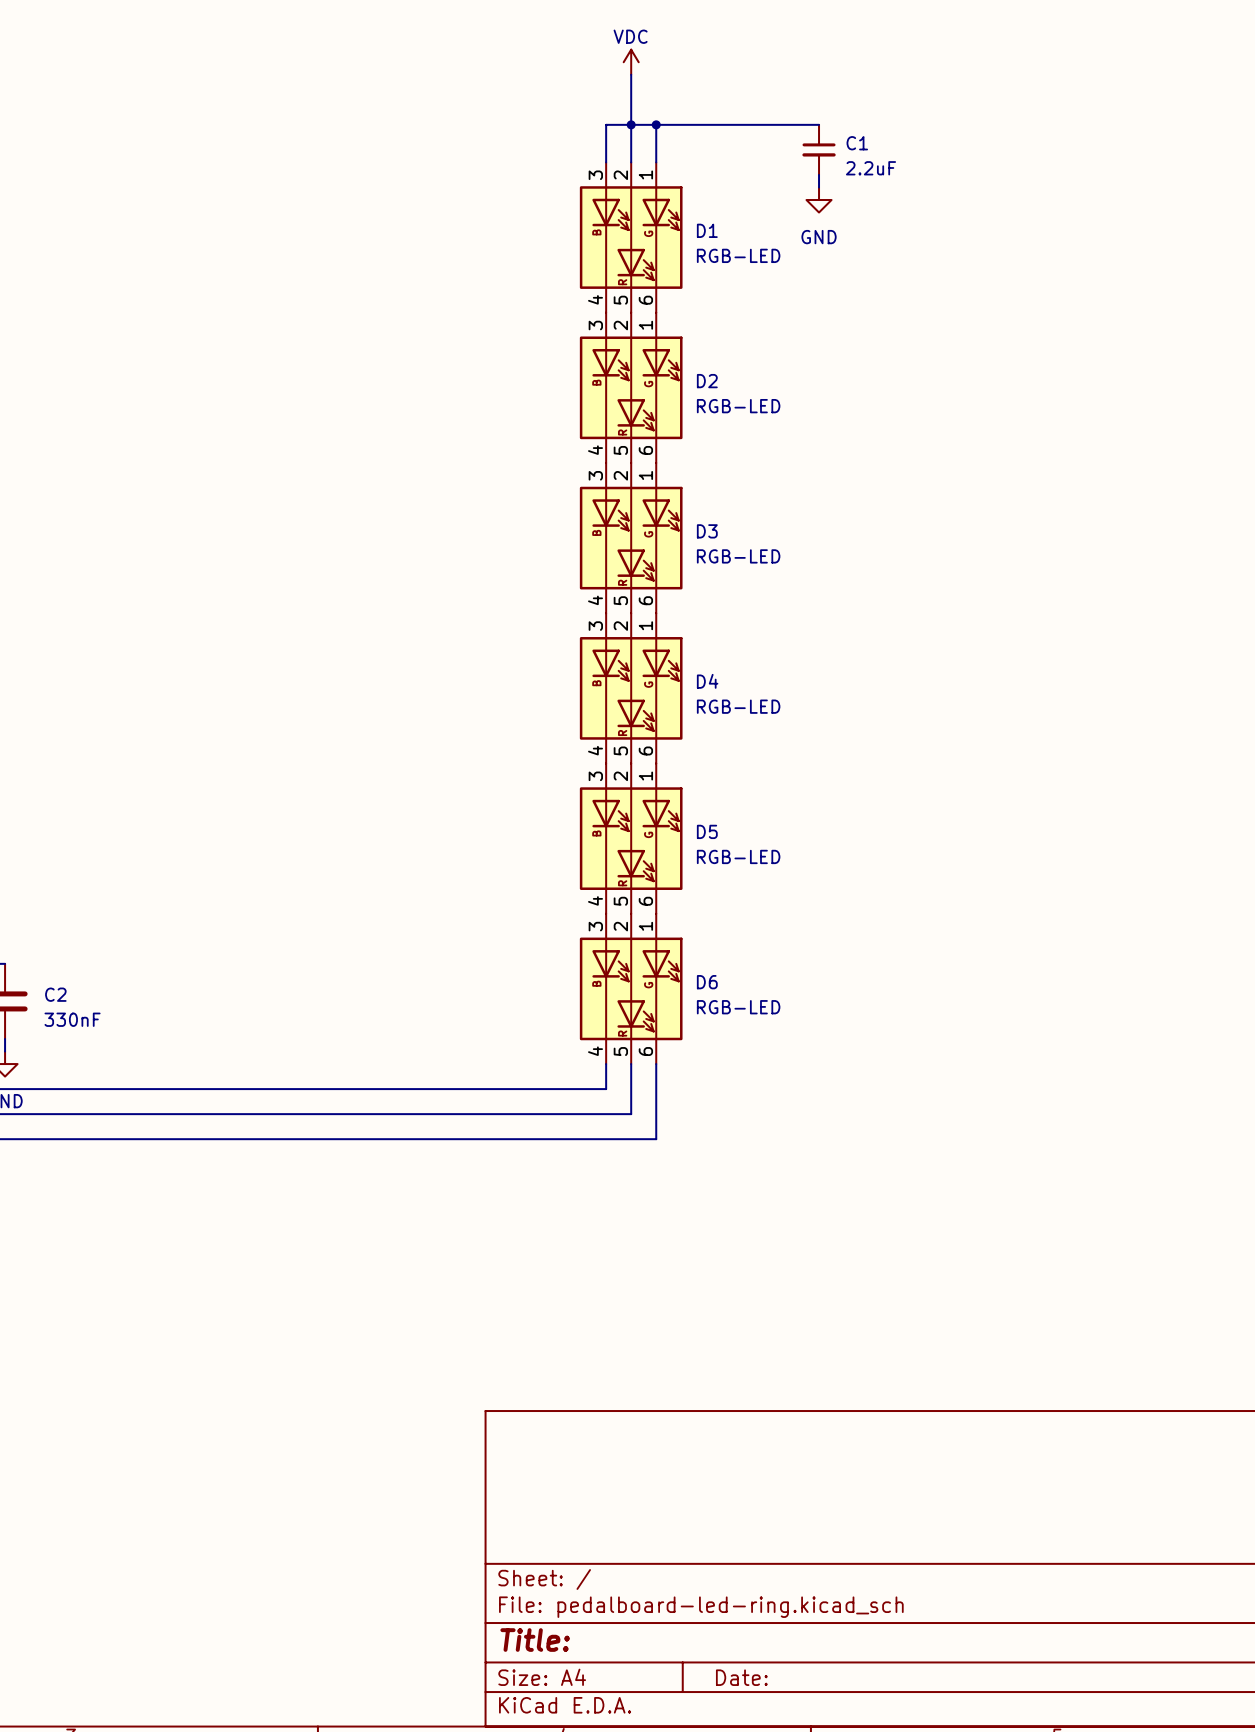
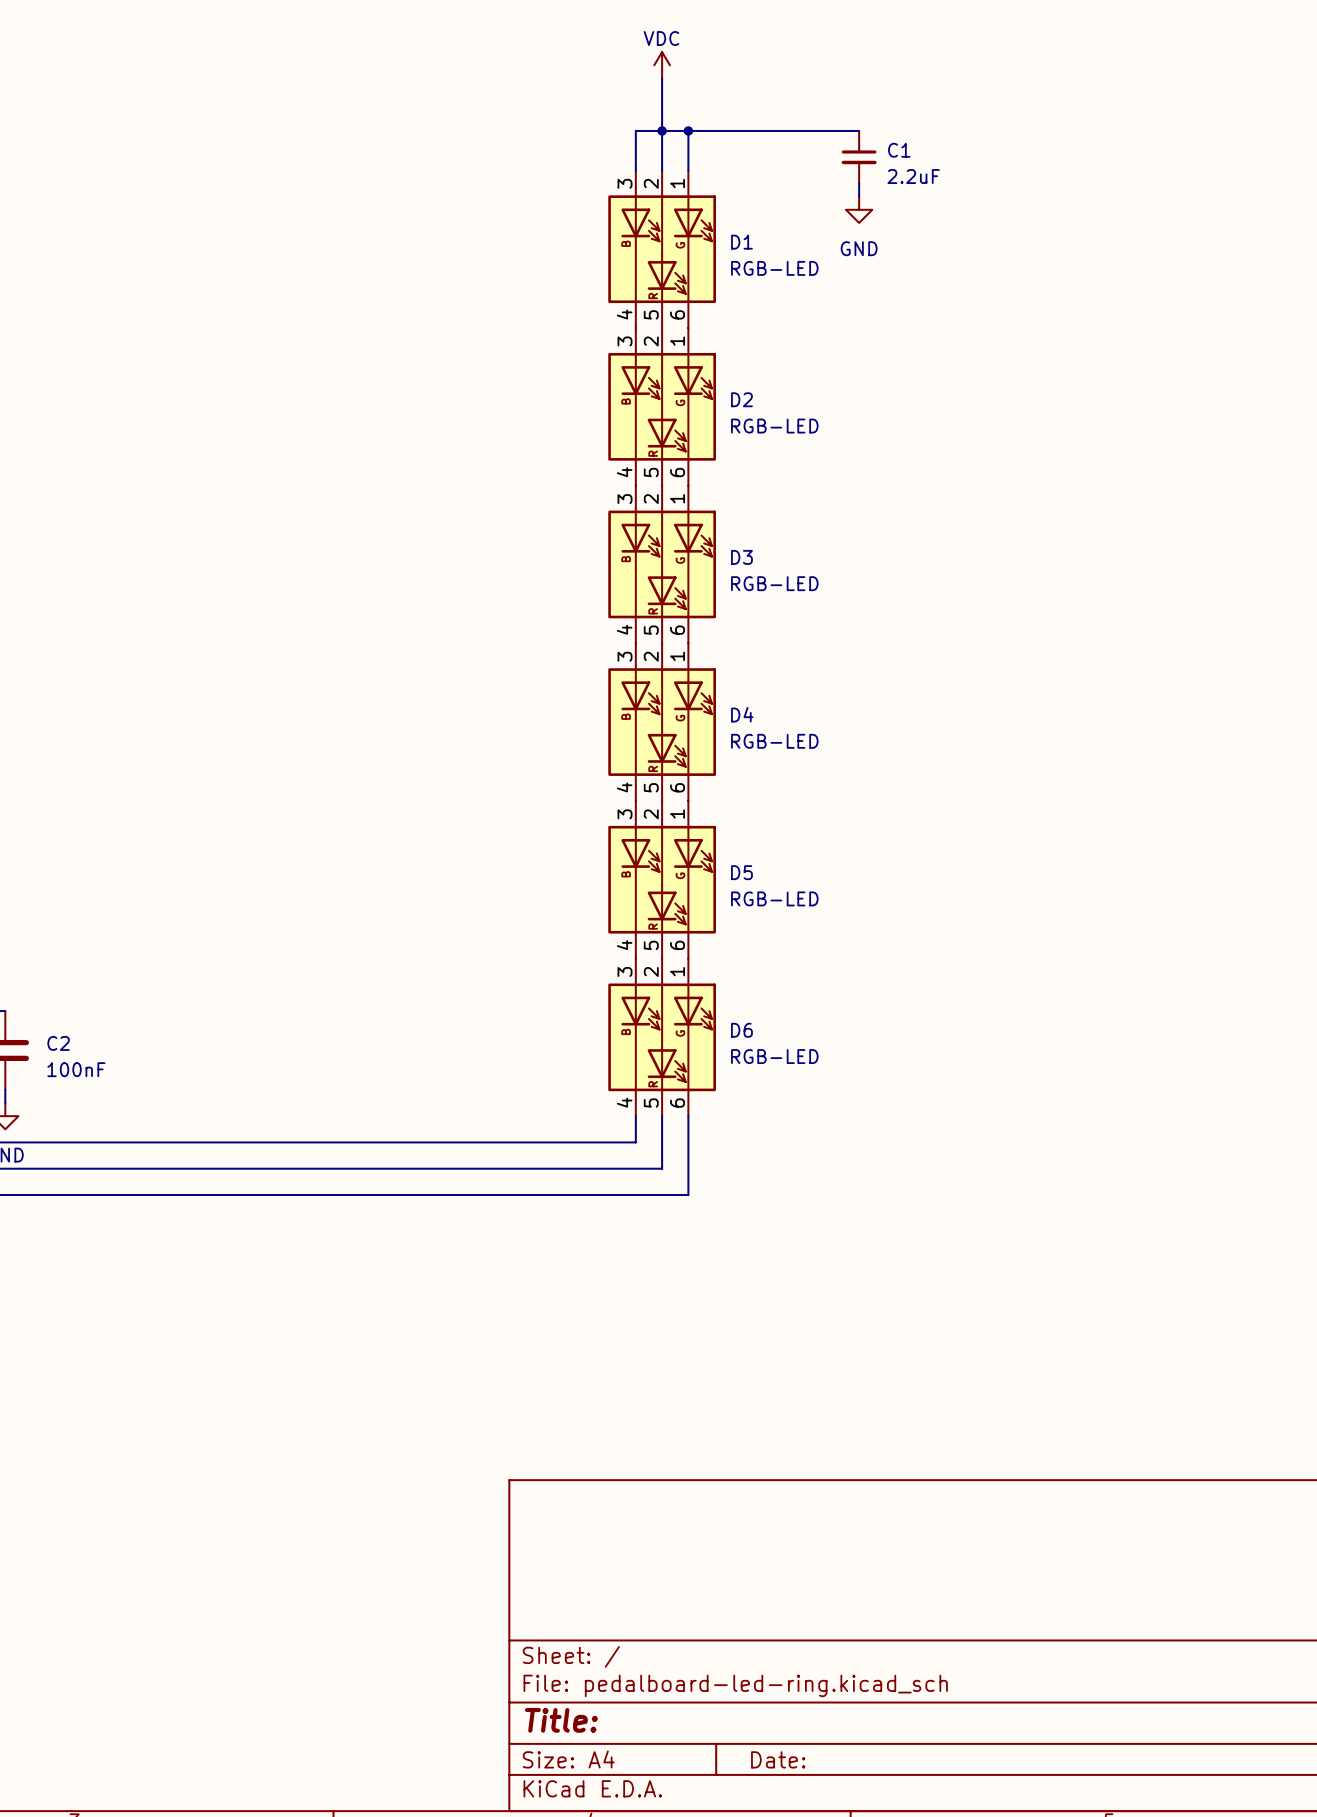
C2 value: 330nF (72, 1019) -> 100nF (76, 1069)

